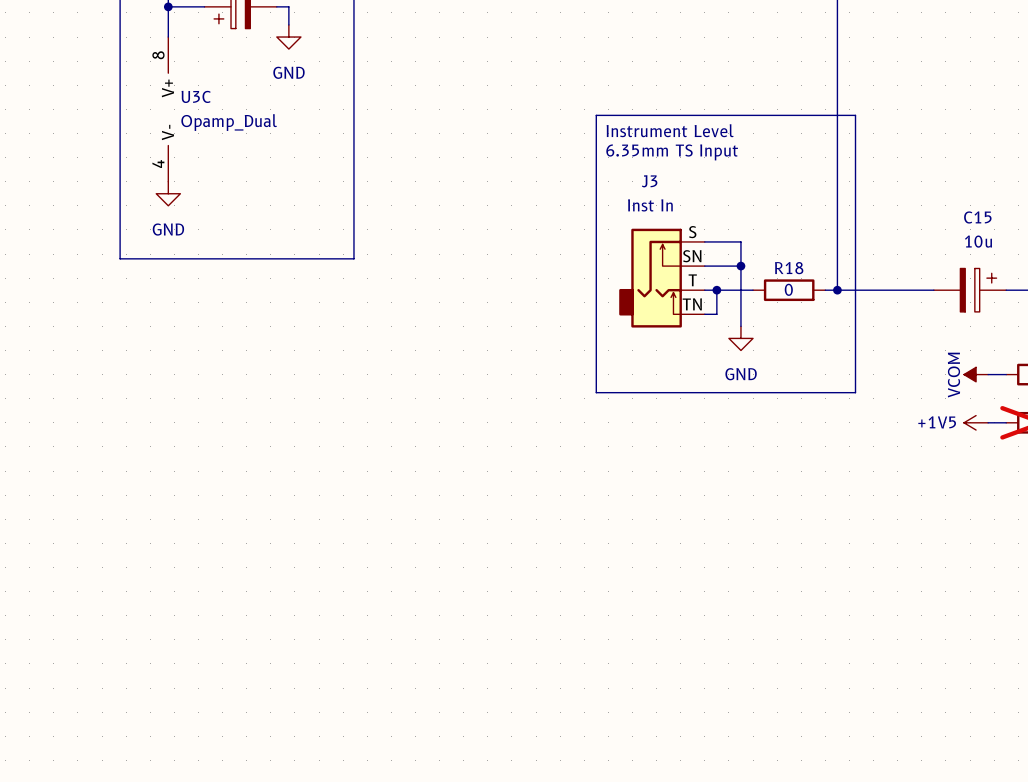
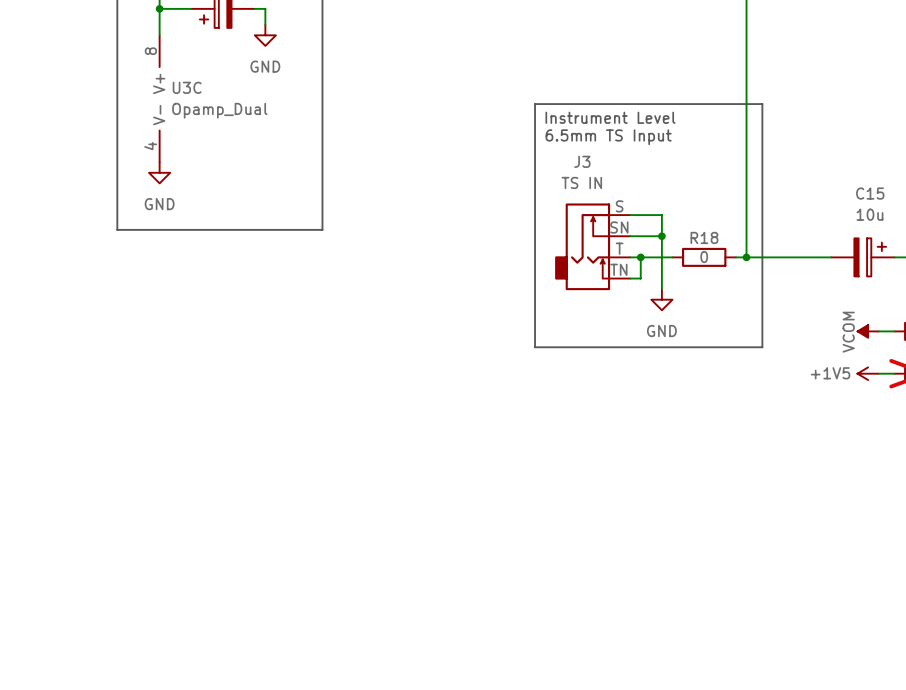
text: 6.35mm TS Input (672, 152) -> 6.5mm TS Input (608, 137)
J3 value: Inst In (650, 205) -> TS IN (581, 182)

